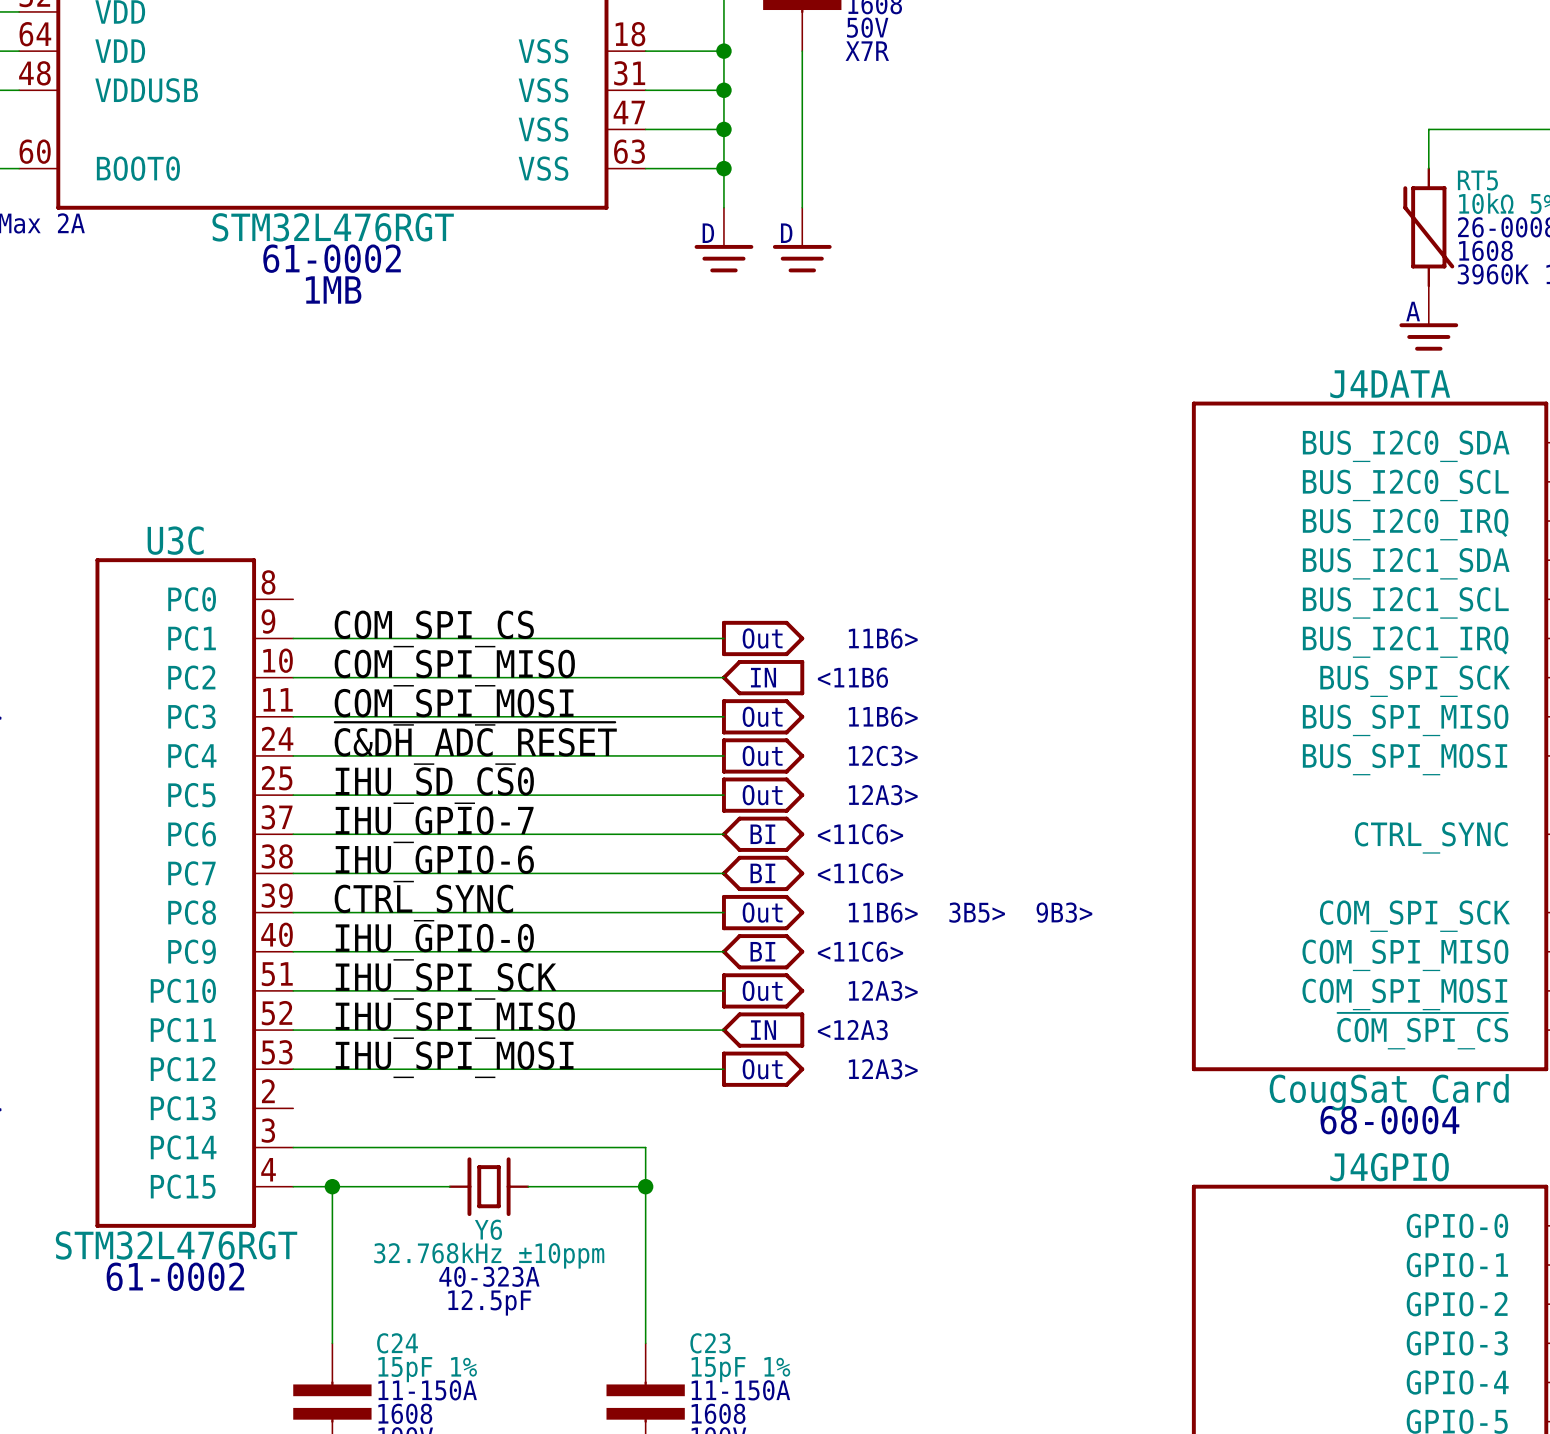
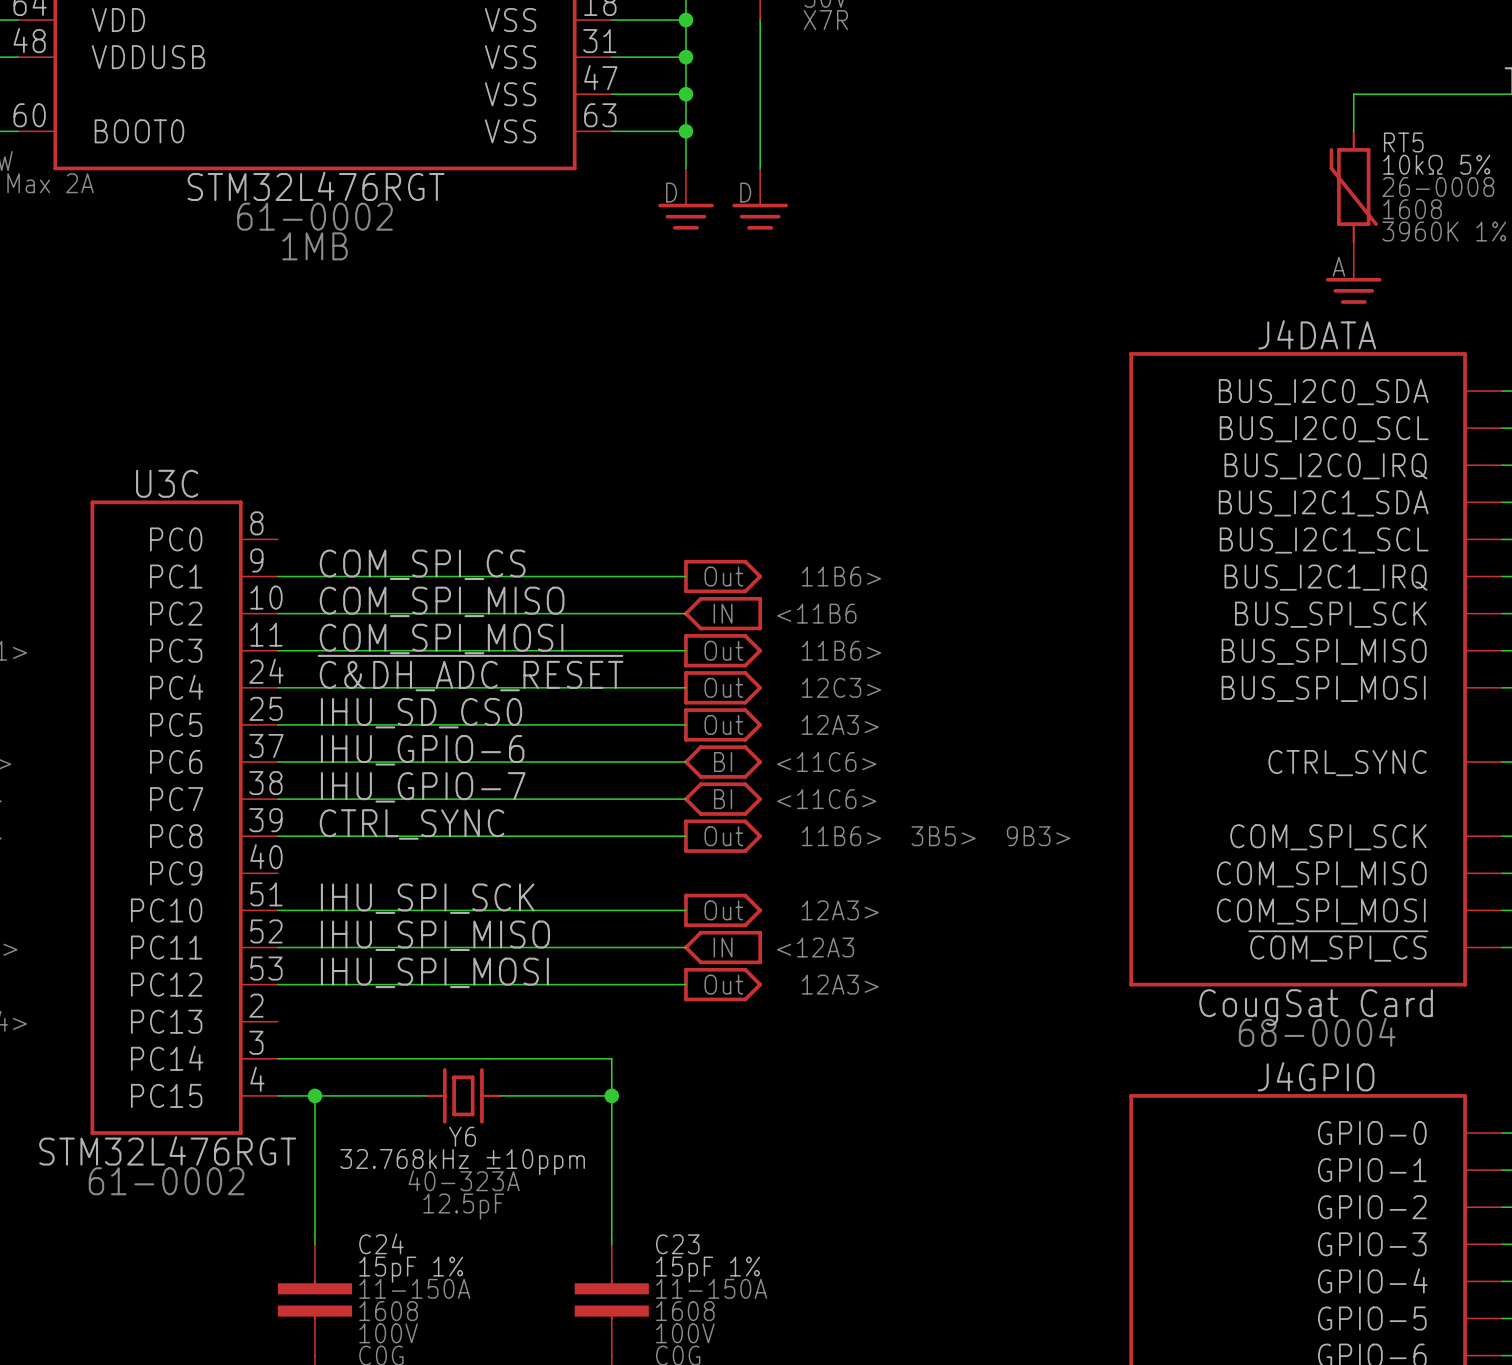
label: IHU_GPIO-7 (434, 824) -> IHU_GPIO-6 (422, 750)
label: IHU_GPIO-6 (434, 863) -> IHU_GPIO-7 (423, 787)
label: IHU_GPIO-0 (434, 942) -> none
wire: (293, 951) (723, 951) -> none
part: (763, 951) -> none
text: <11C6> (860, 951) -> none

